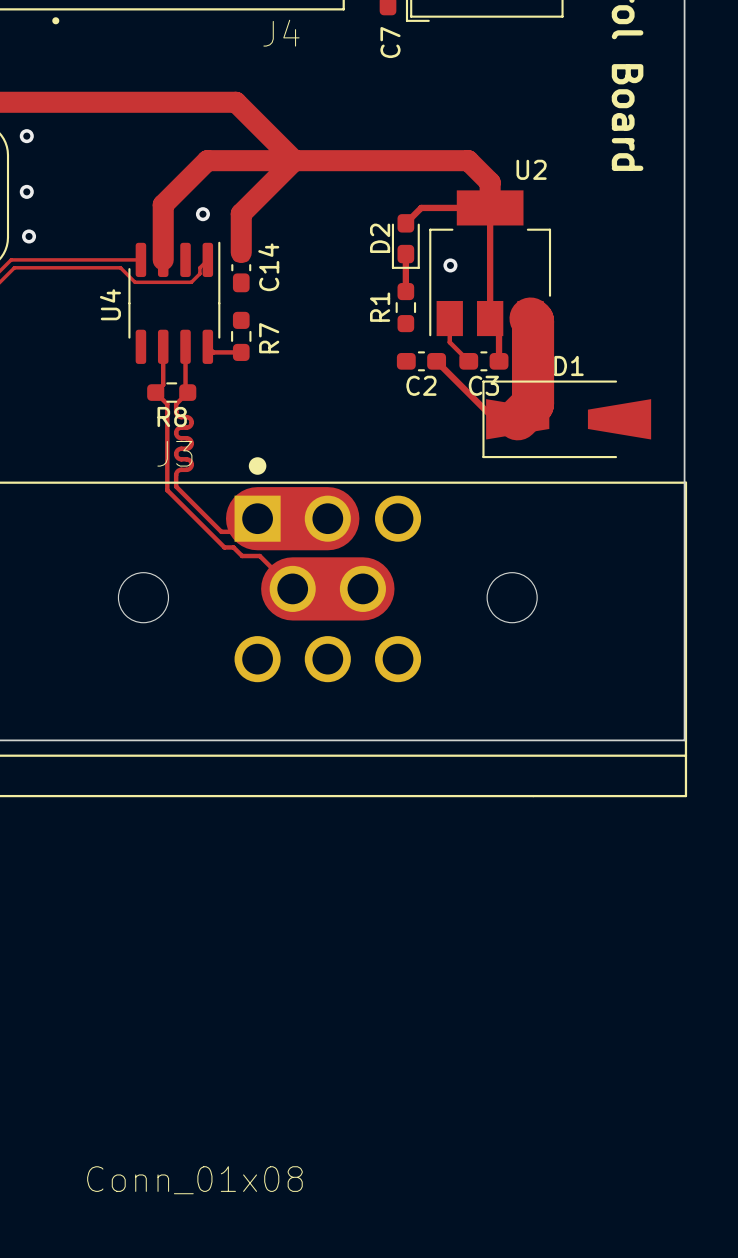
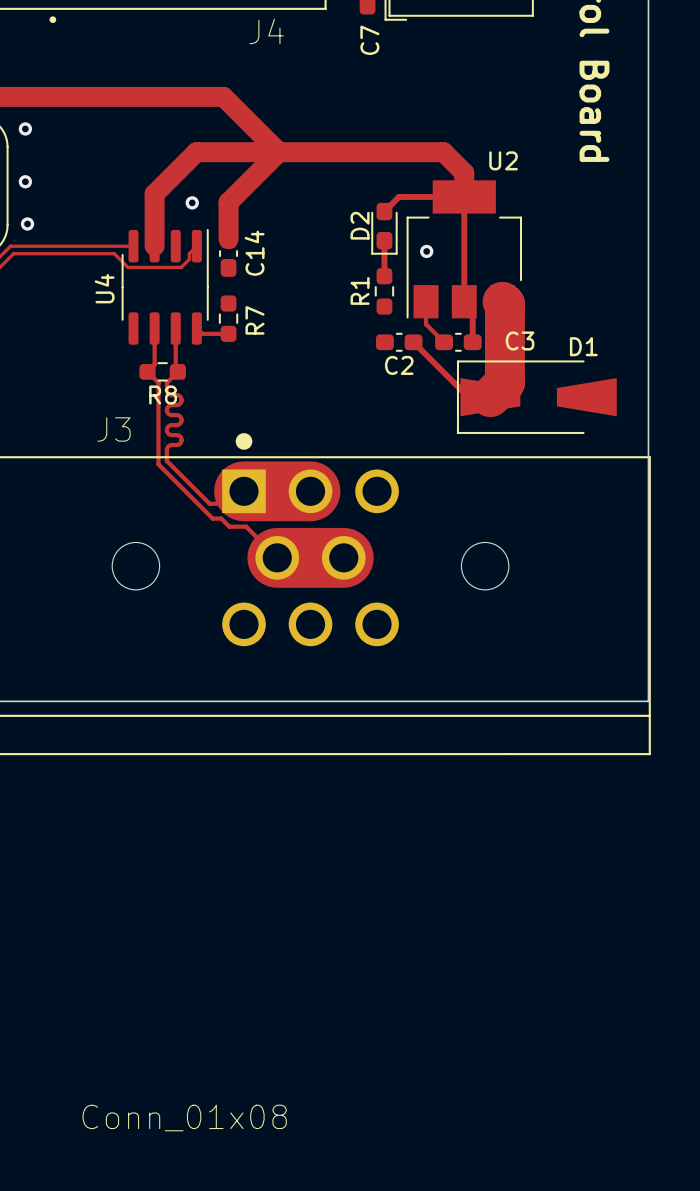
D1 name position: D1 (569, 365) -> D1 (583, 346)
C3 name position: C3 (483, 385) -> C3 (520, 341)
J3 name position: J3 (174, 453) -> J3 (113, 429)

